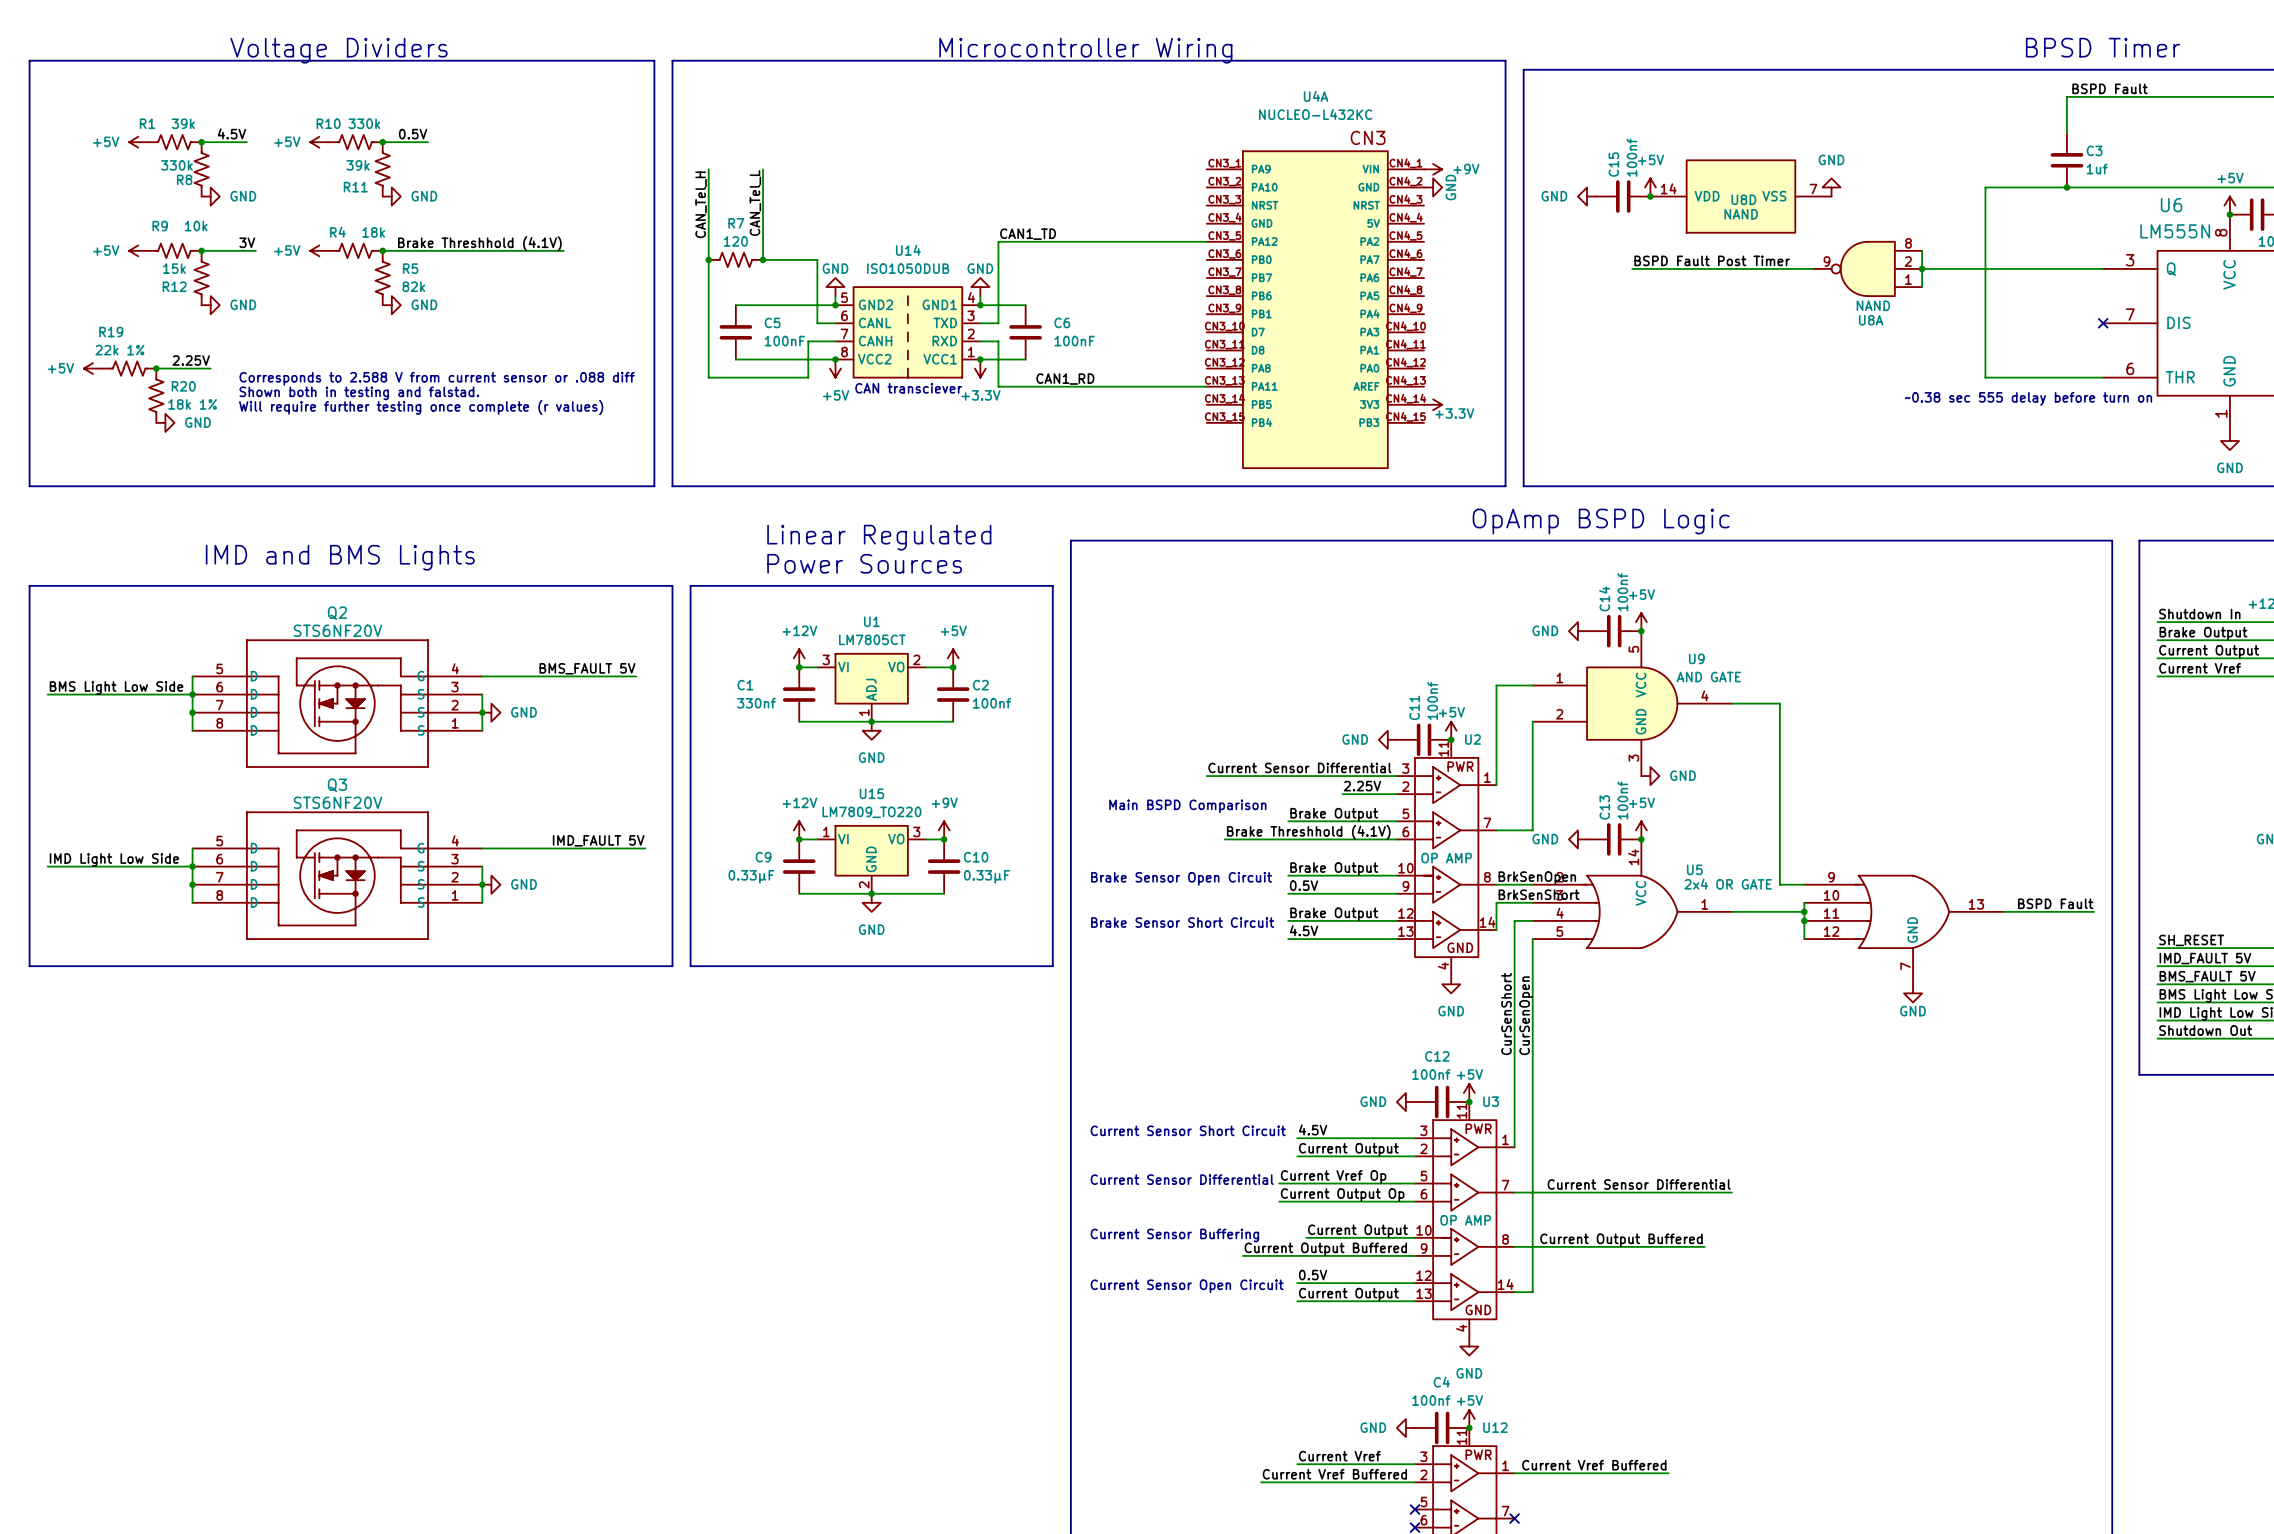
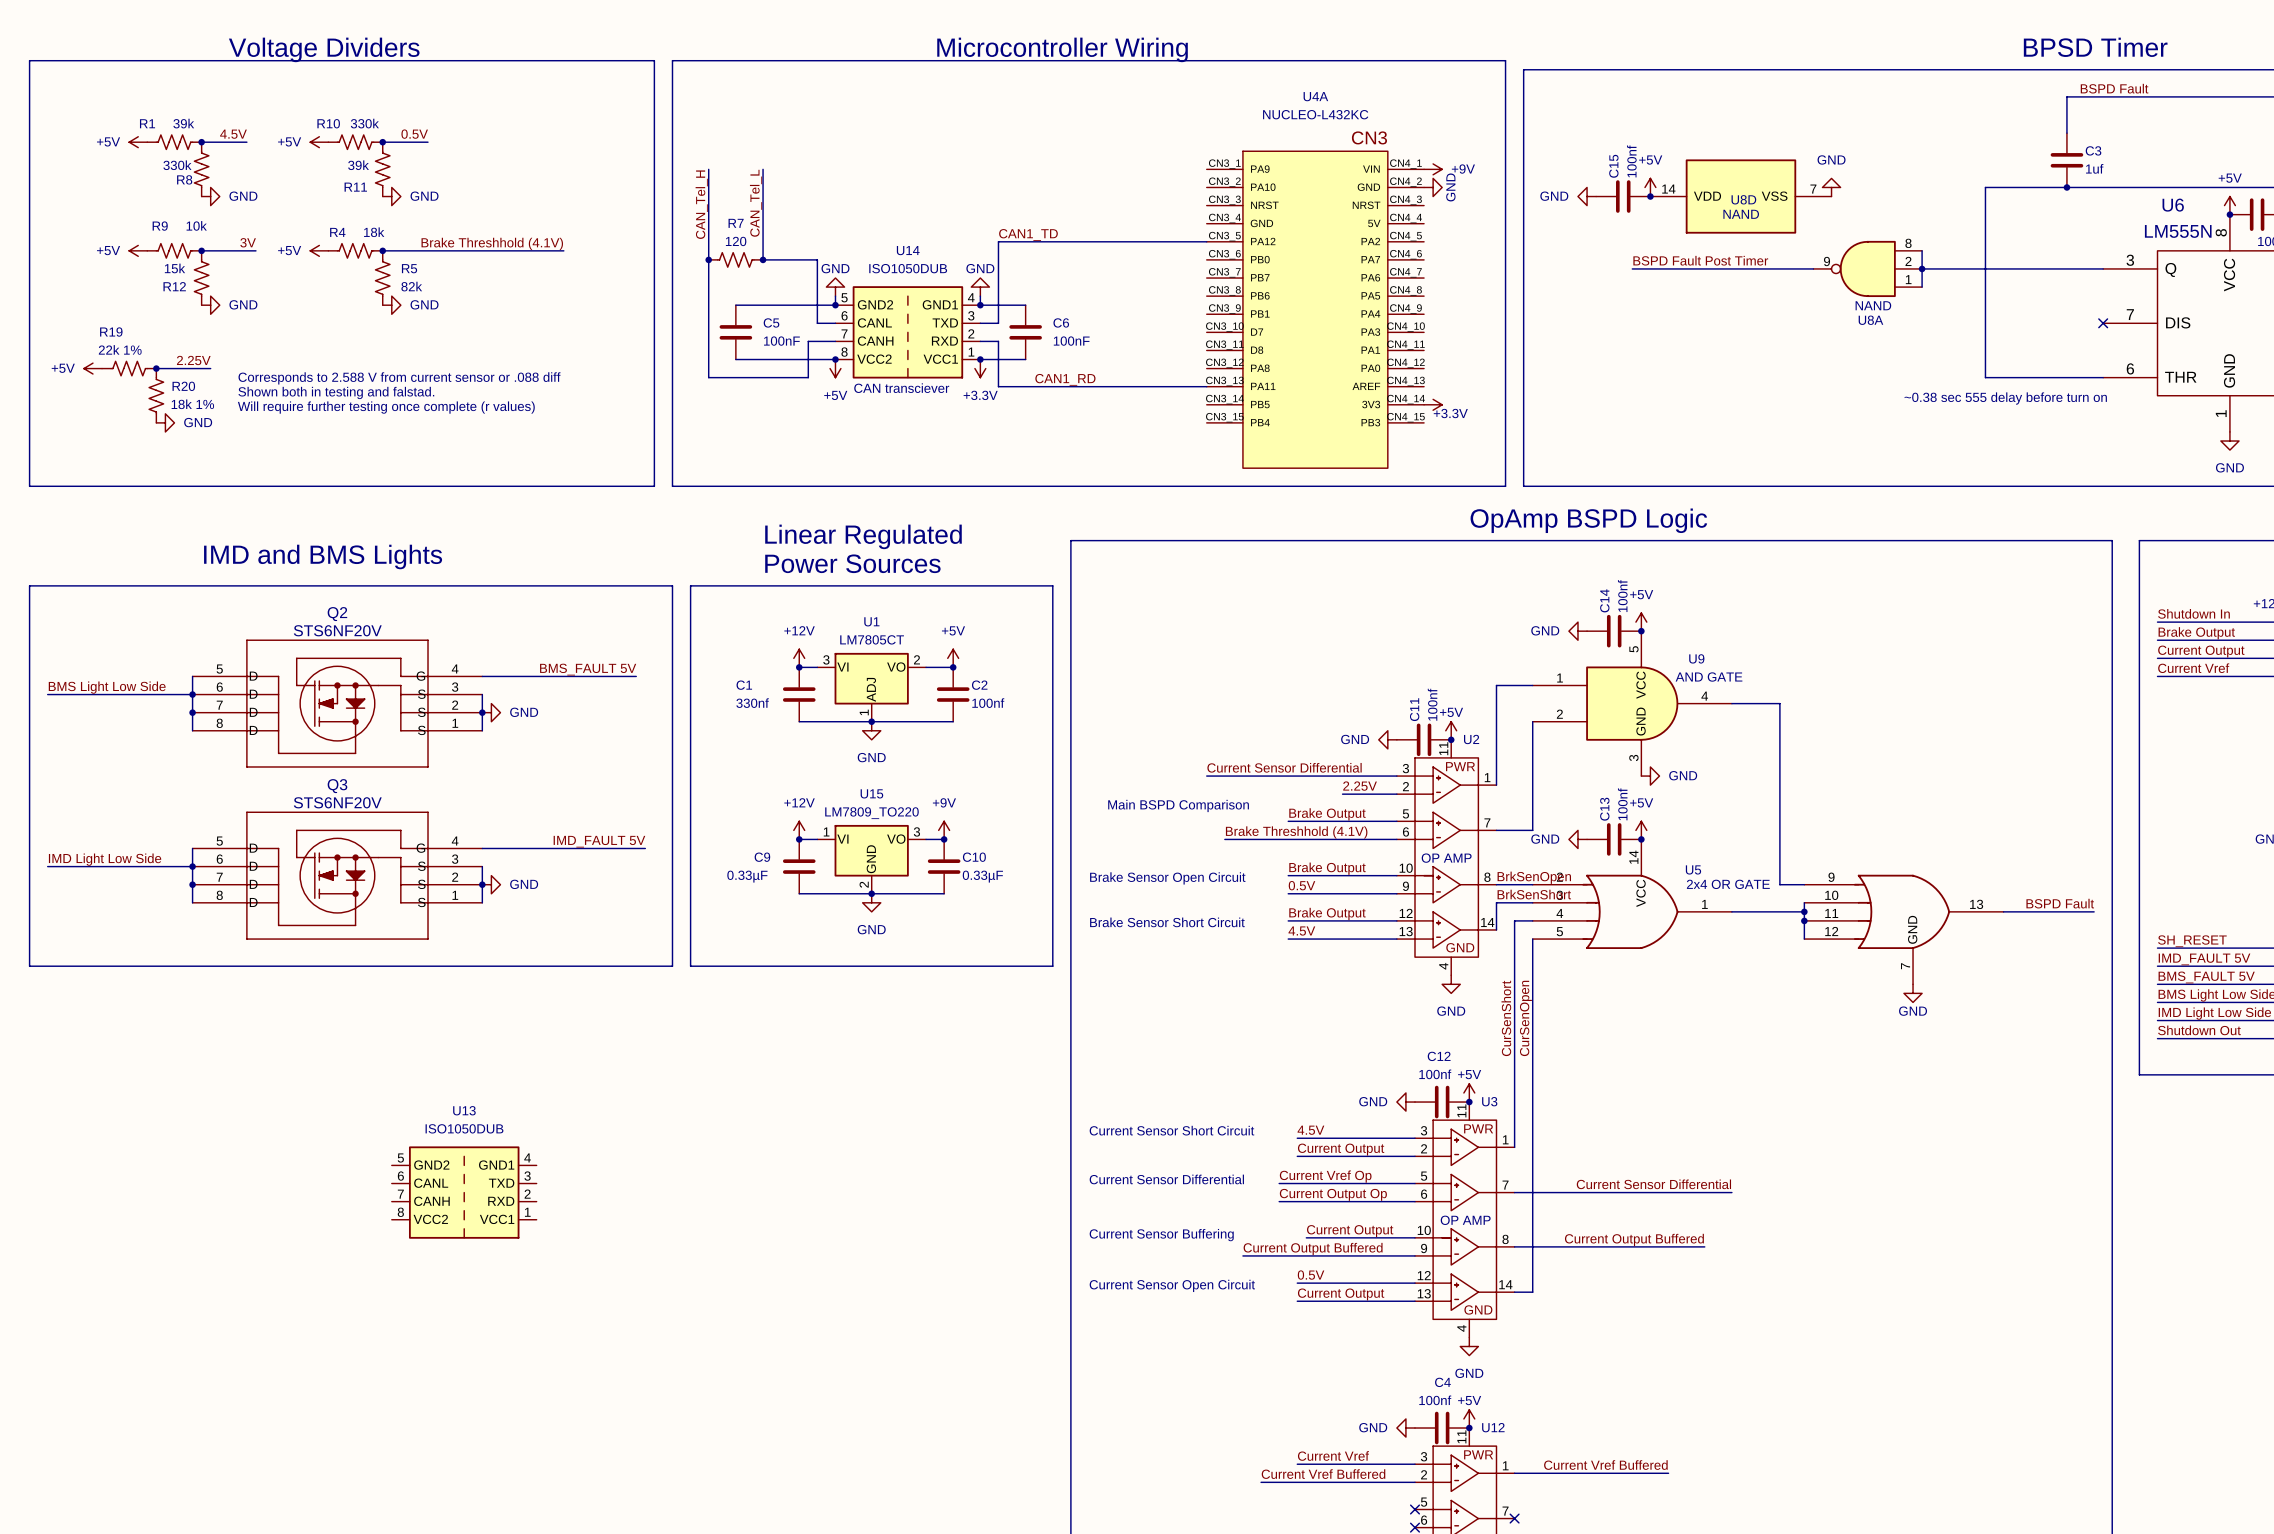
U13: none -> ISO1050DUB (464, 1192)

